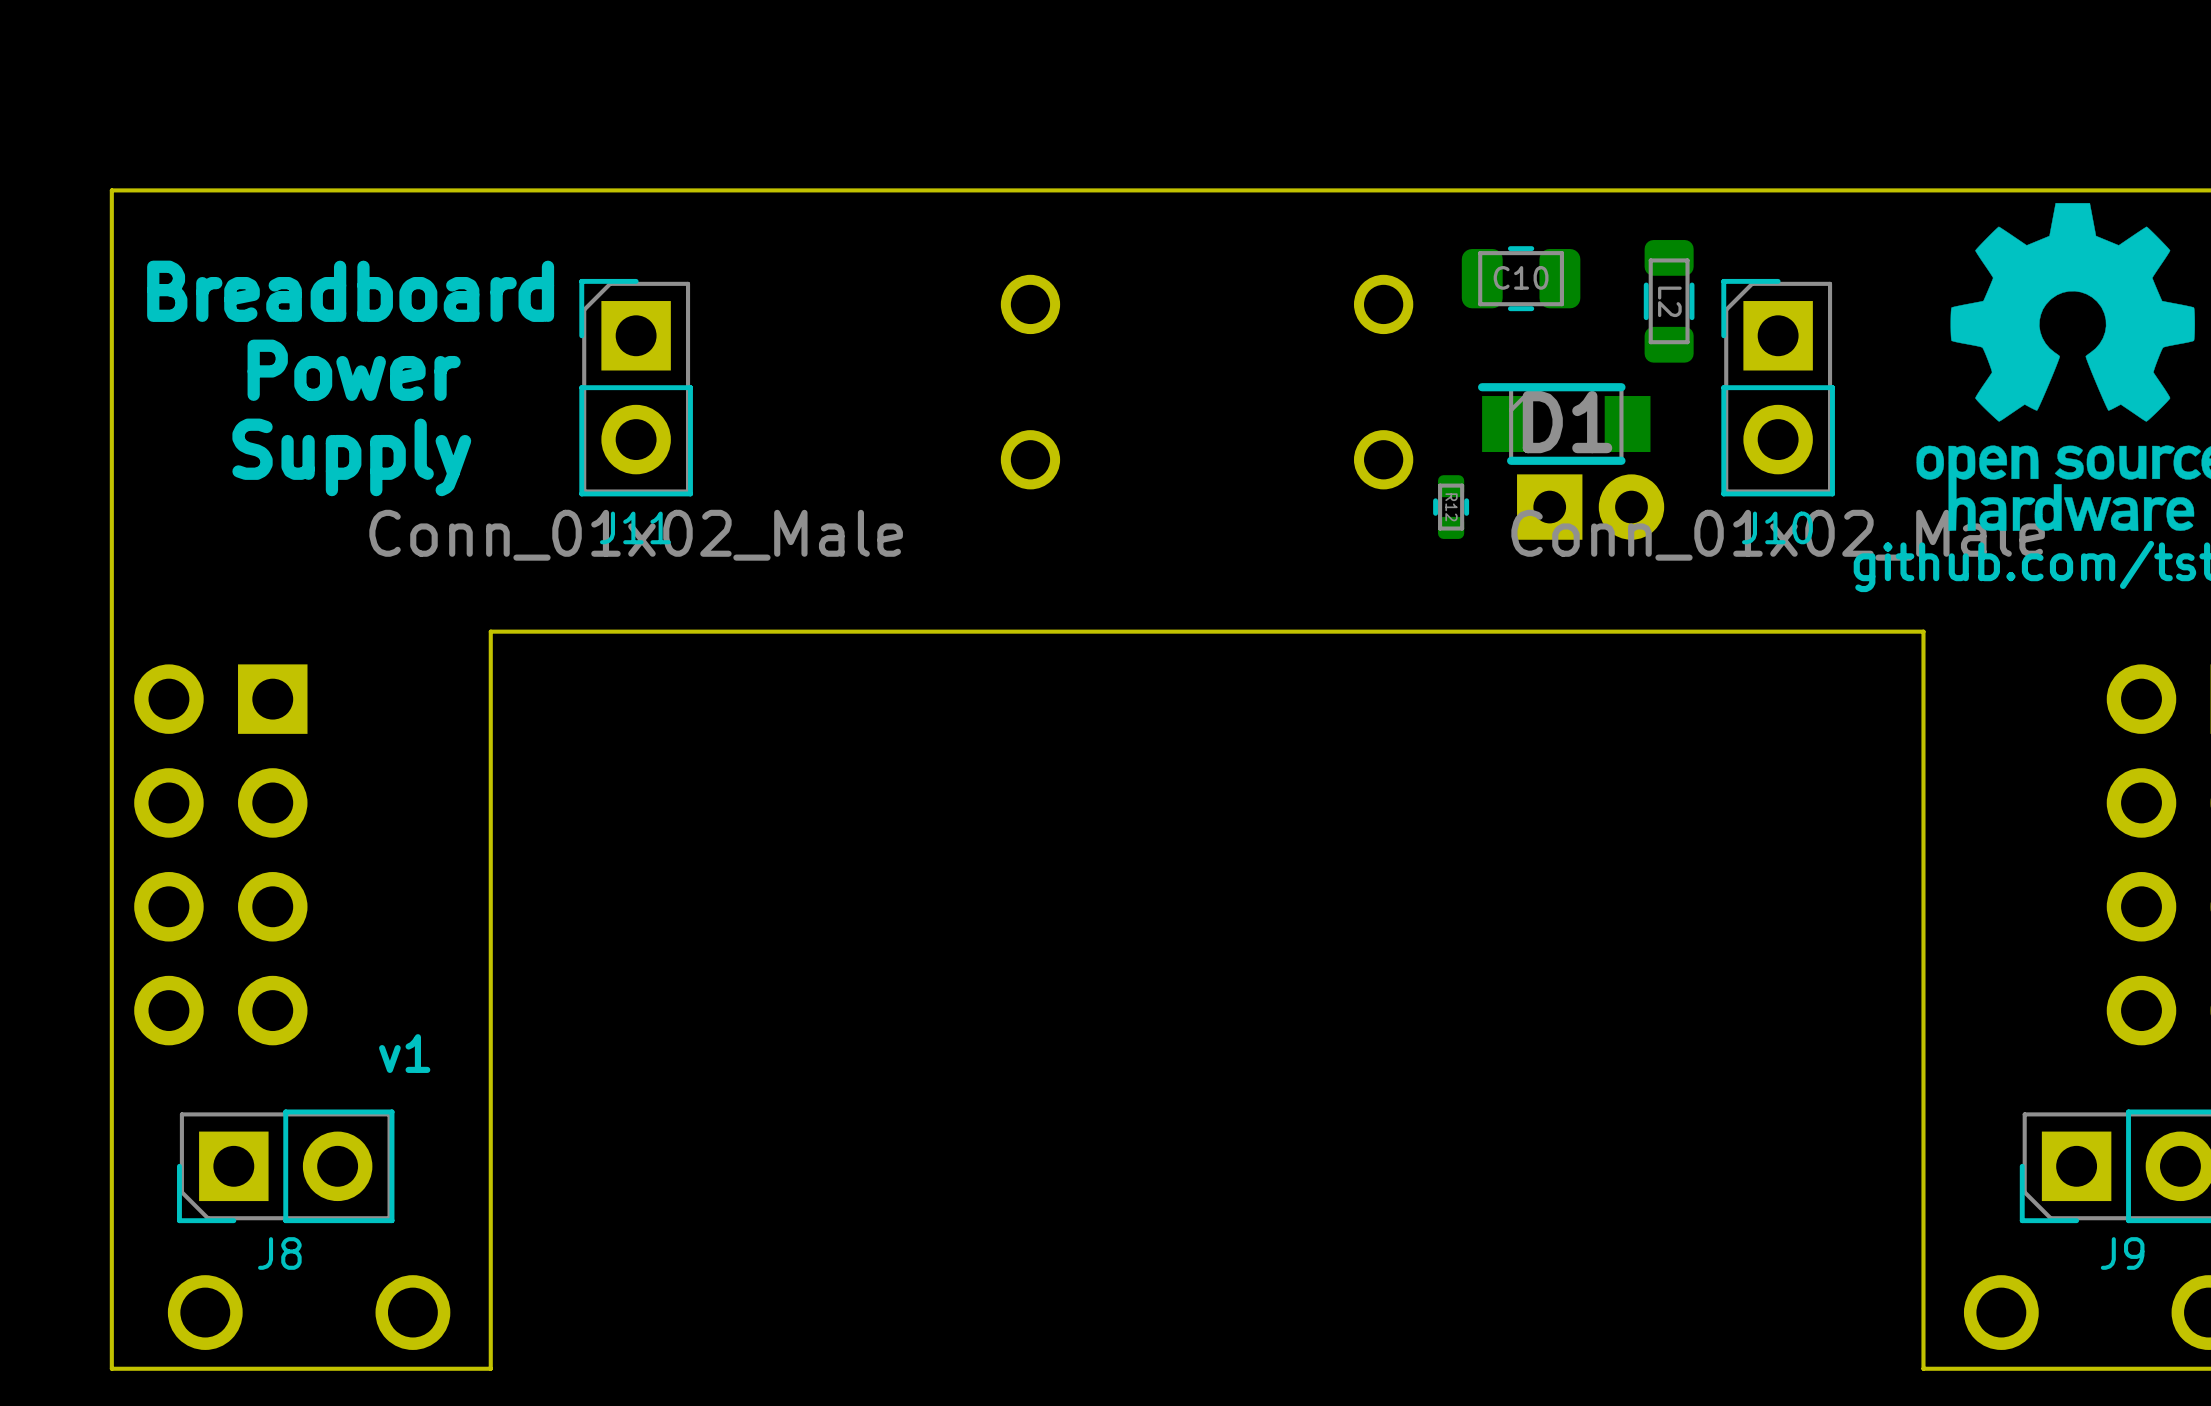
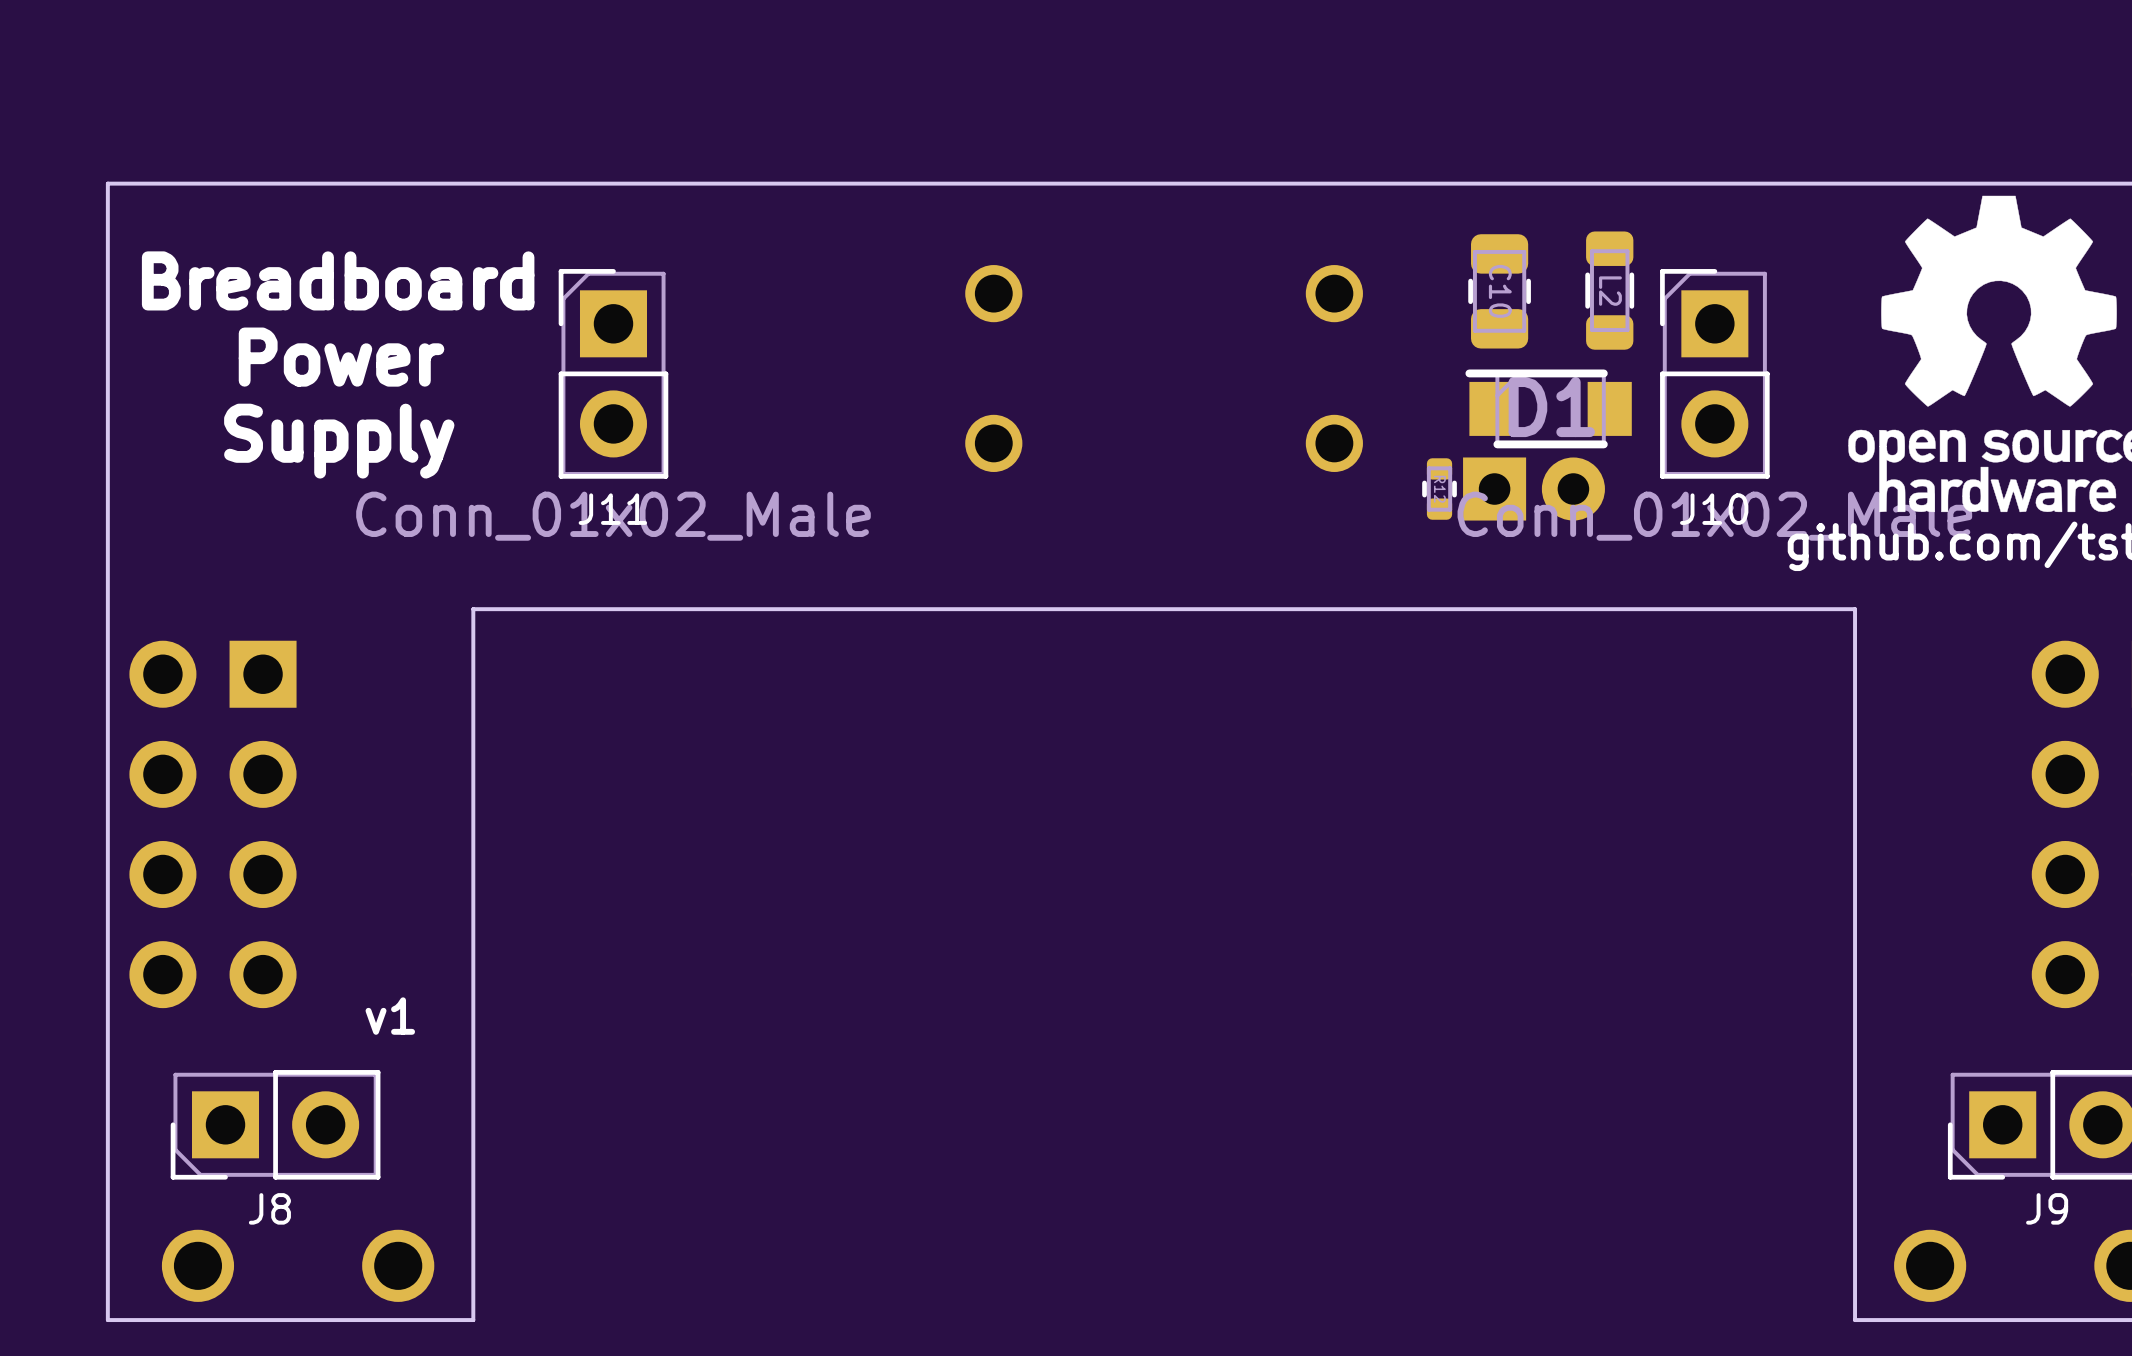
C10 rotation: 0° (1521, 278) -> 90° clockwise (1499, 291)
D1 position: (1564, 424) -> (1548, 408)
R12 position: (1451, 507) -> (1439, 489)

